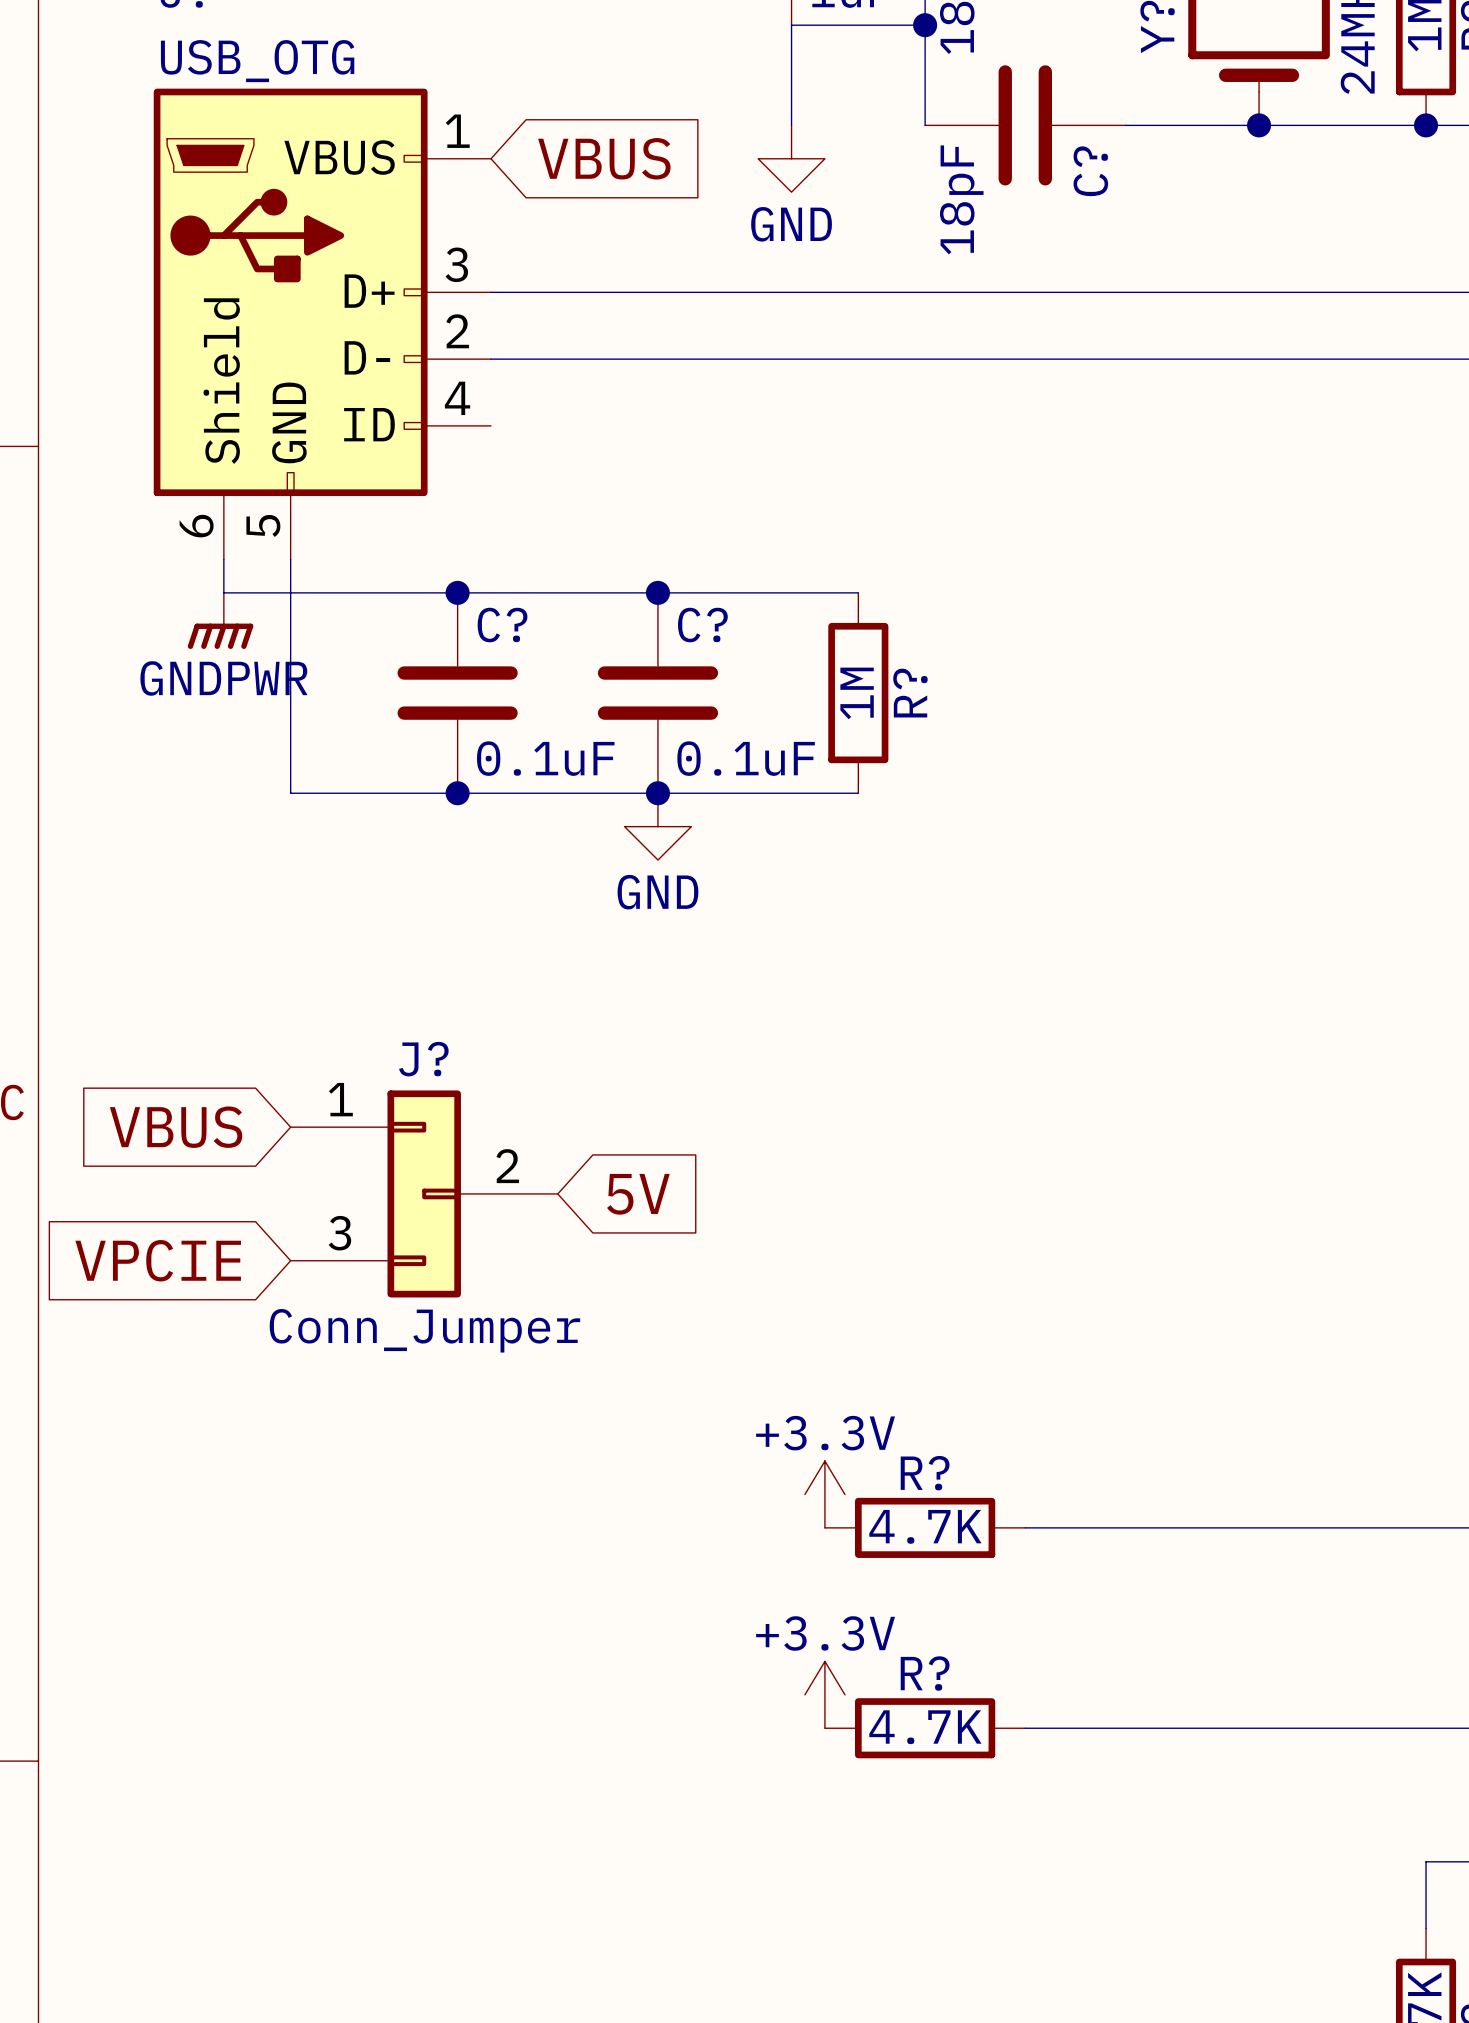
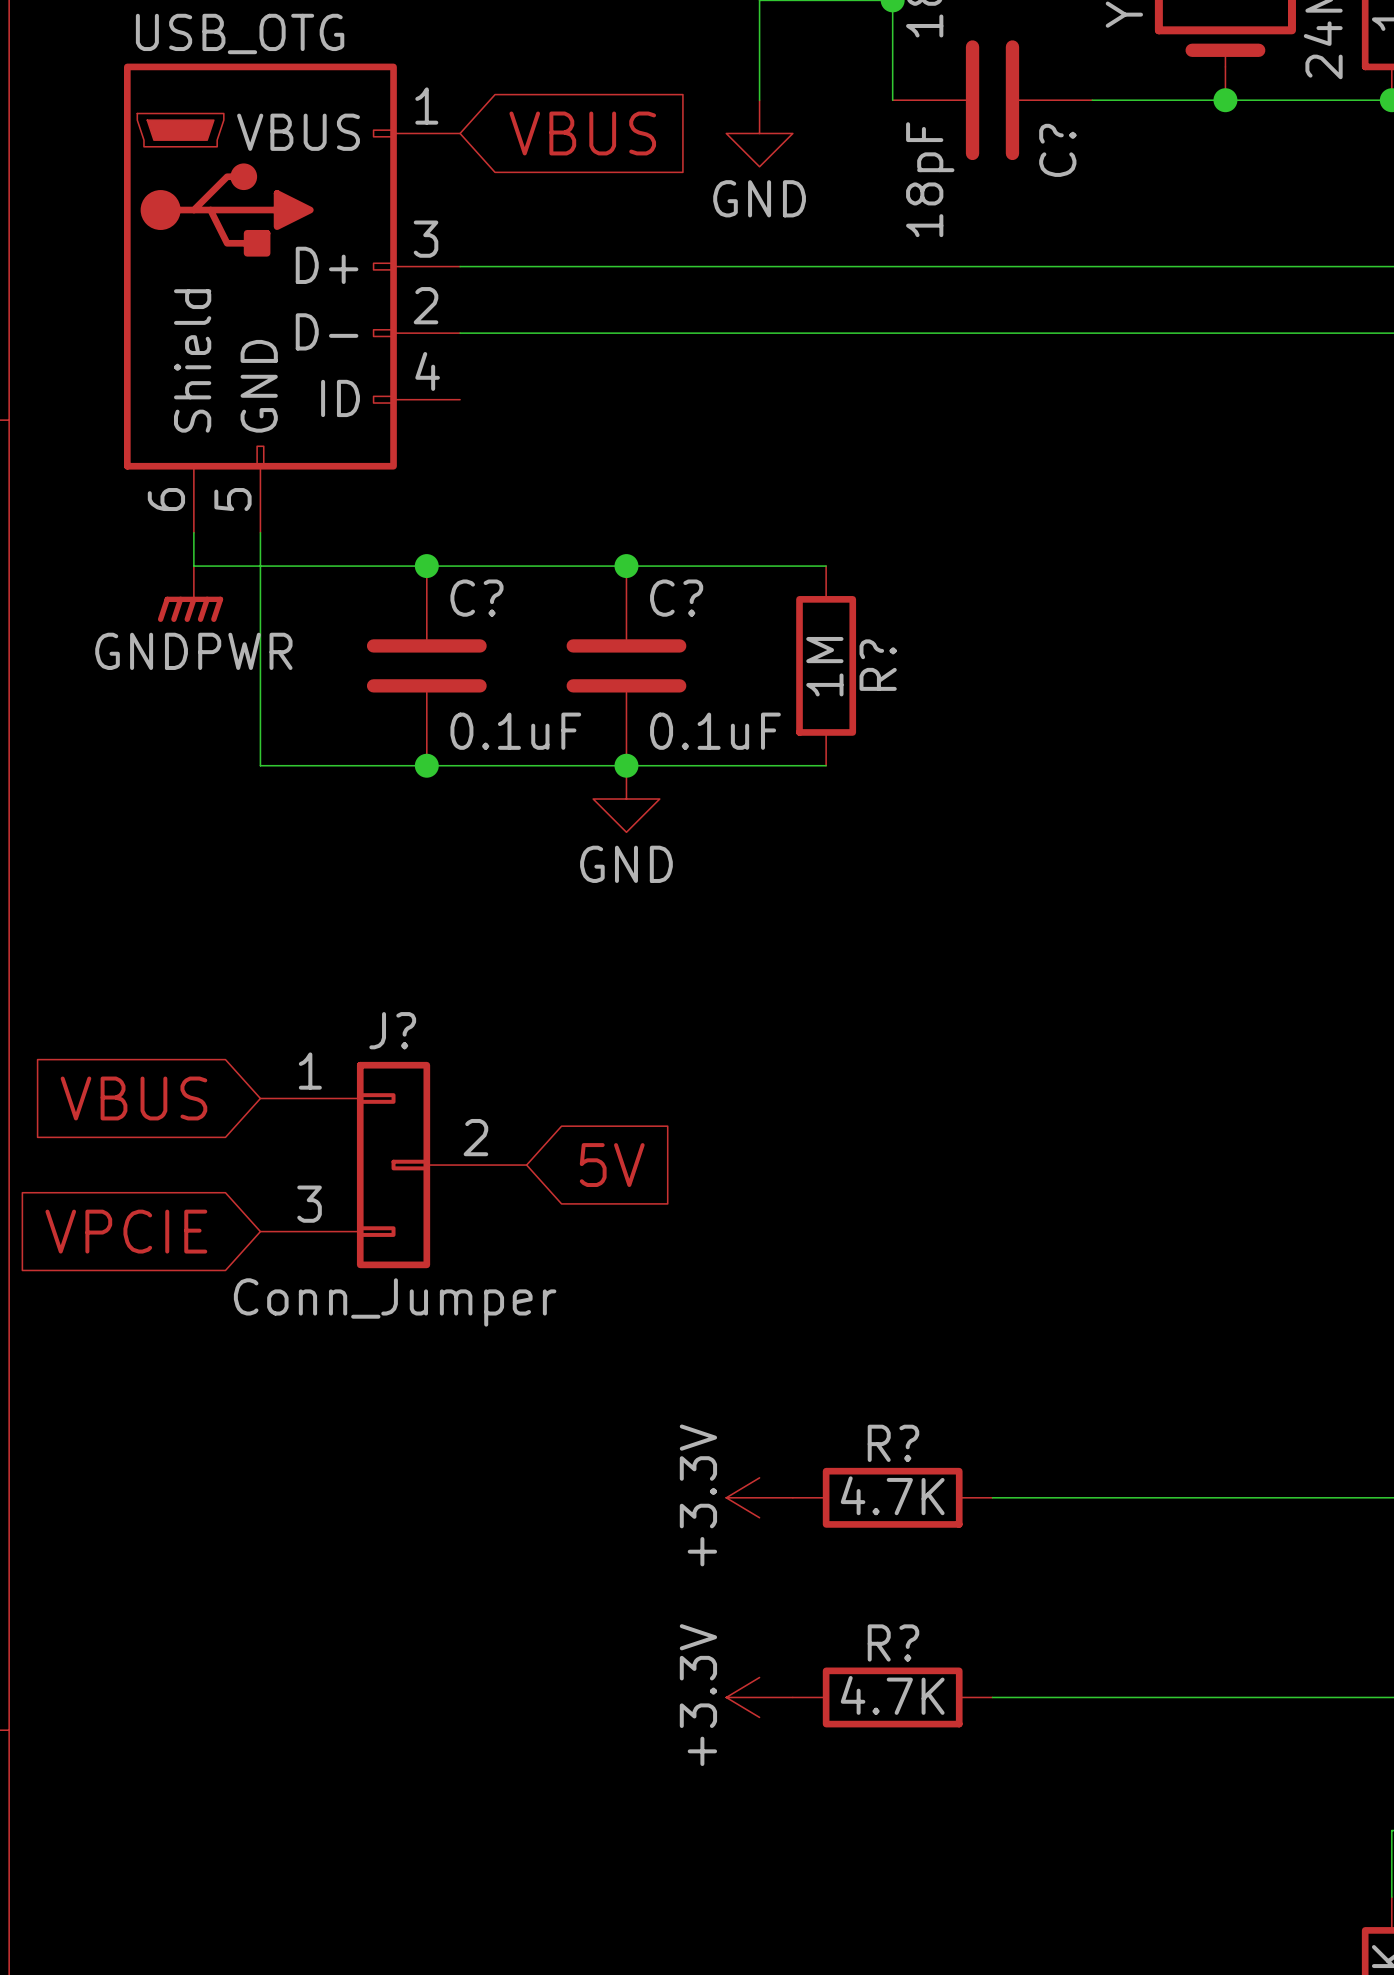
power symbol rotation: 0° (824, 1494) -> 90° counterclockwise (759, 1497)
power symbol position: +3.3V (824, 1494) -> +3.3V (759, 1497)
power symbol rotation: 0° (824, 1694) -> 90° counterclockwise (759, 1697)
power symbol position: +3.3V (824, 1694) -> +3.3V (759, 1697)

